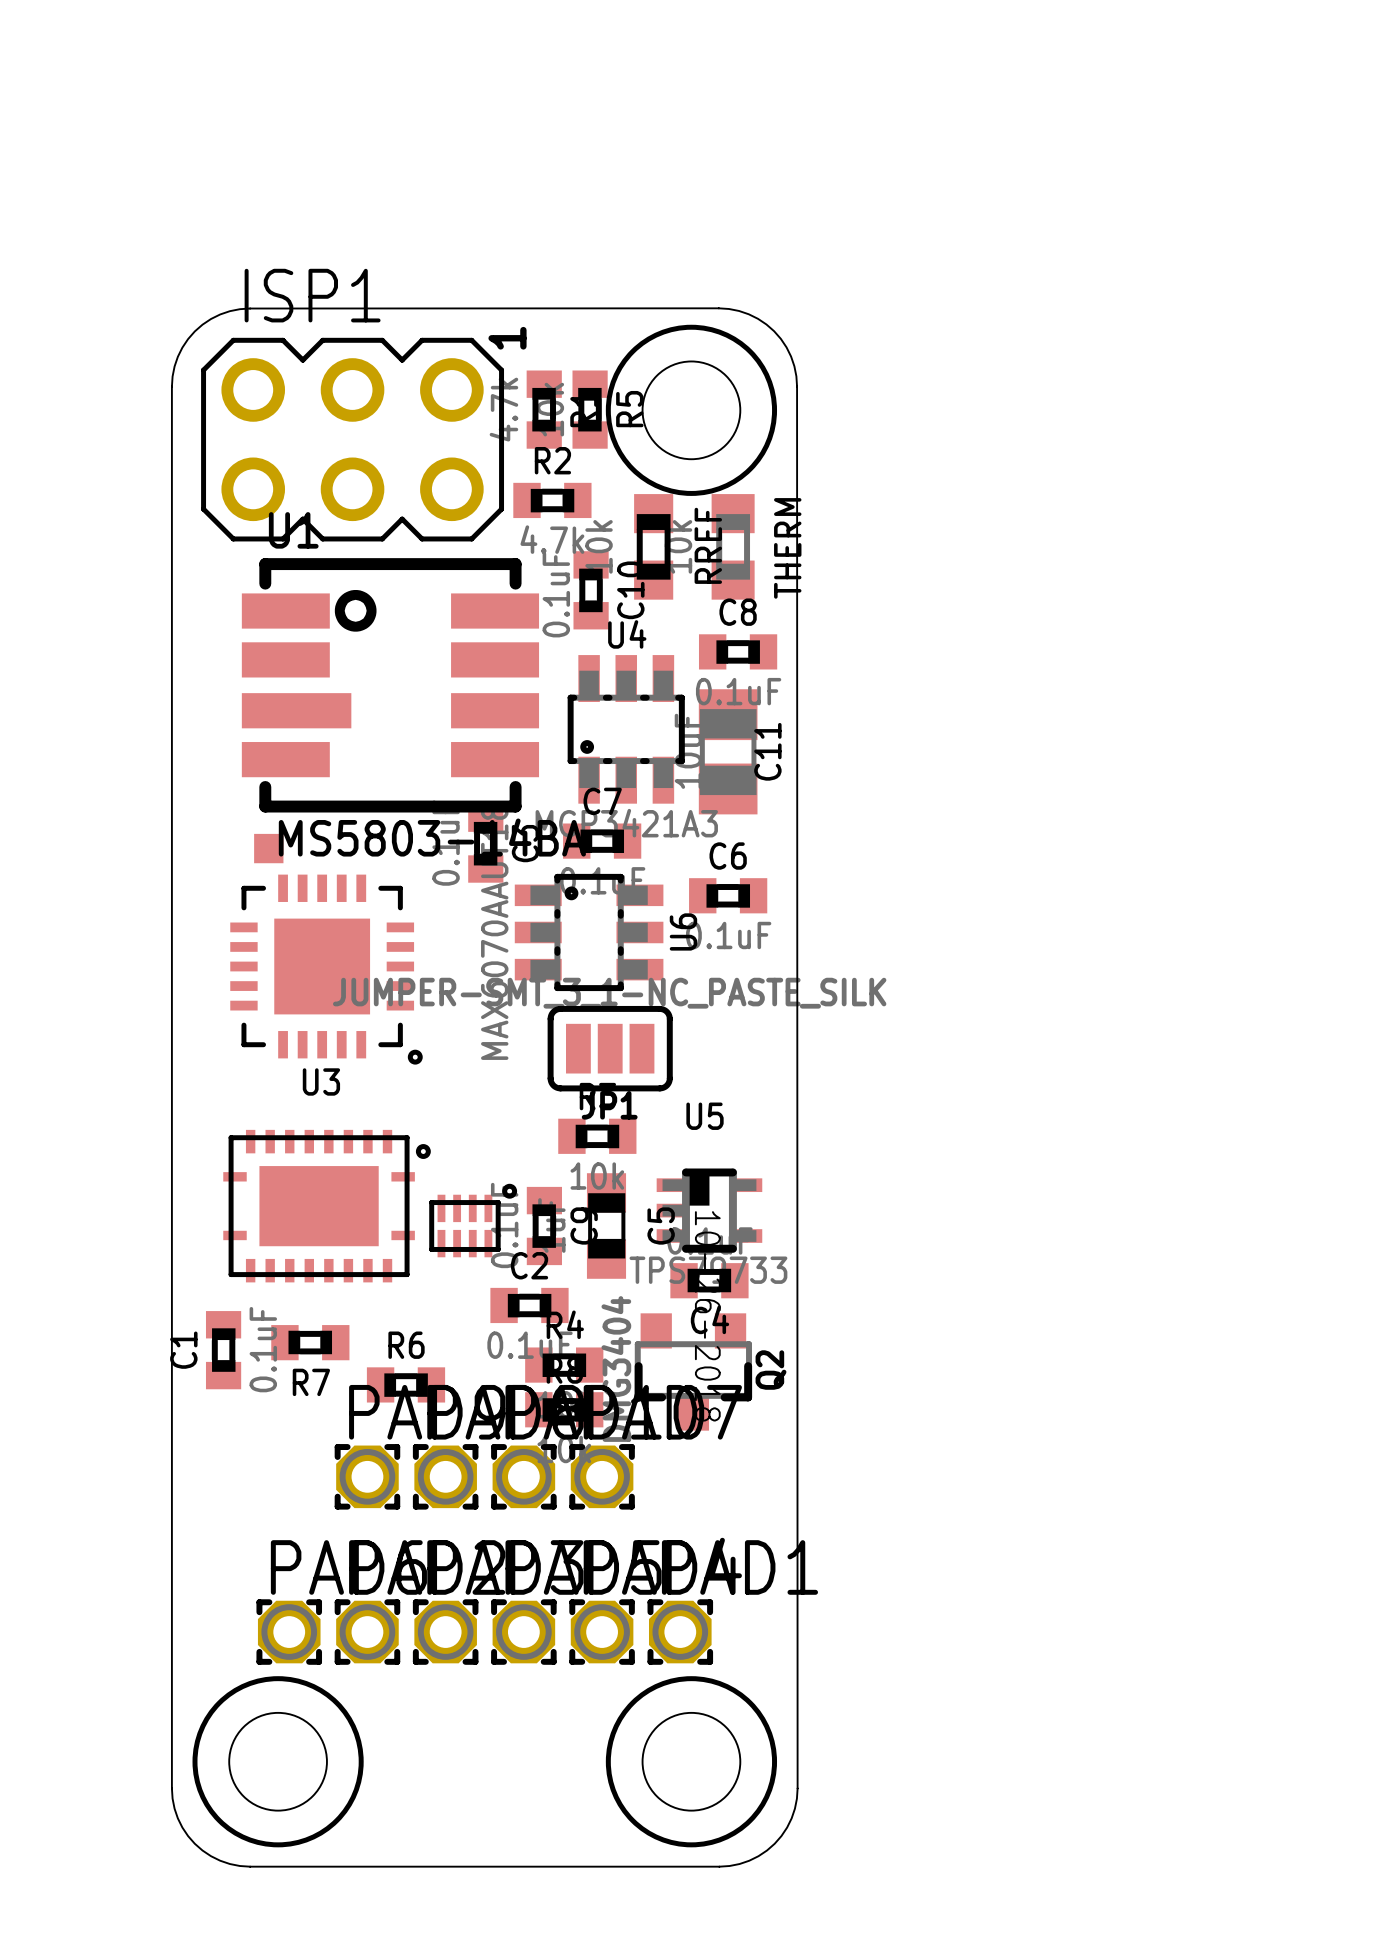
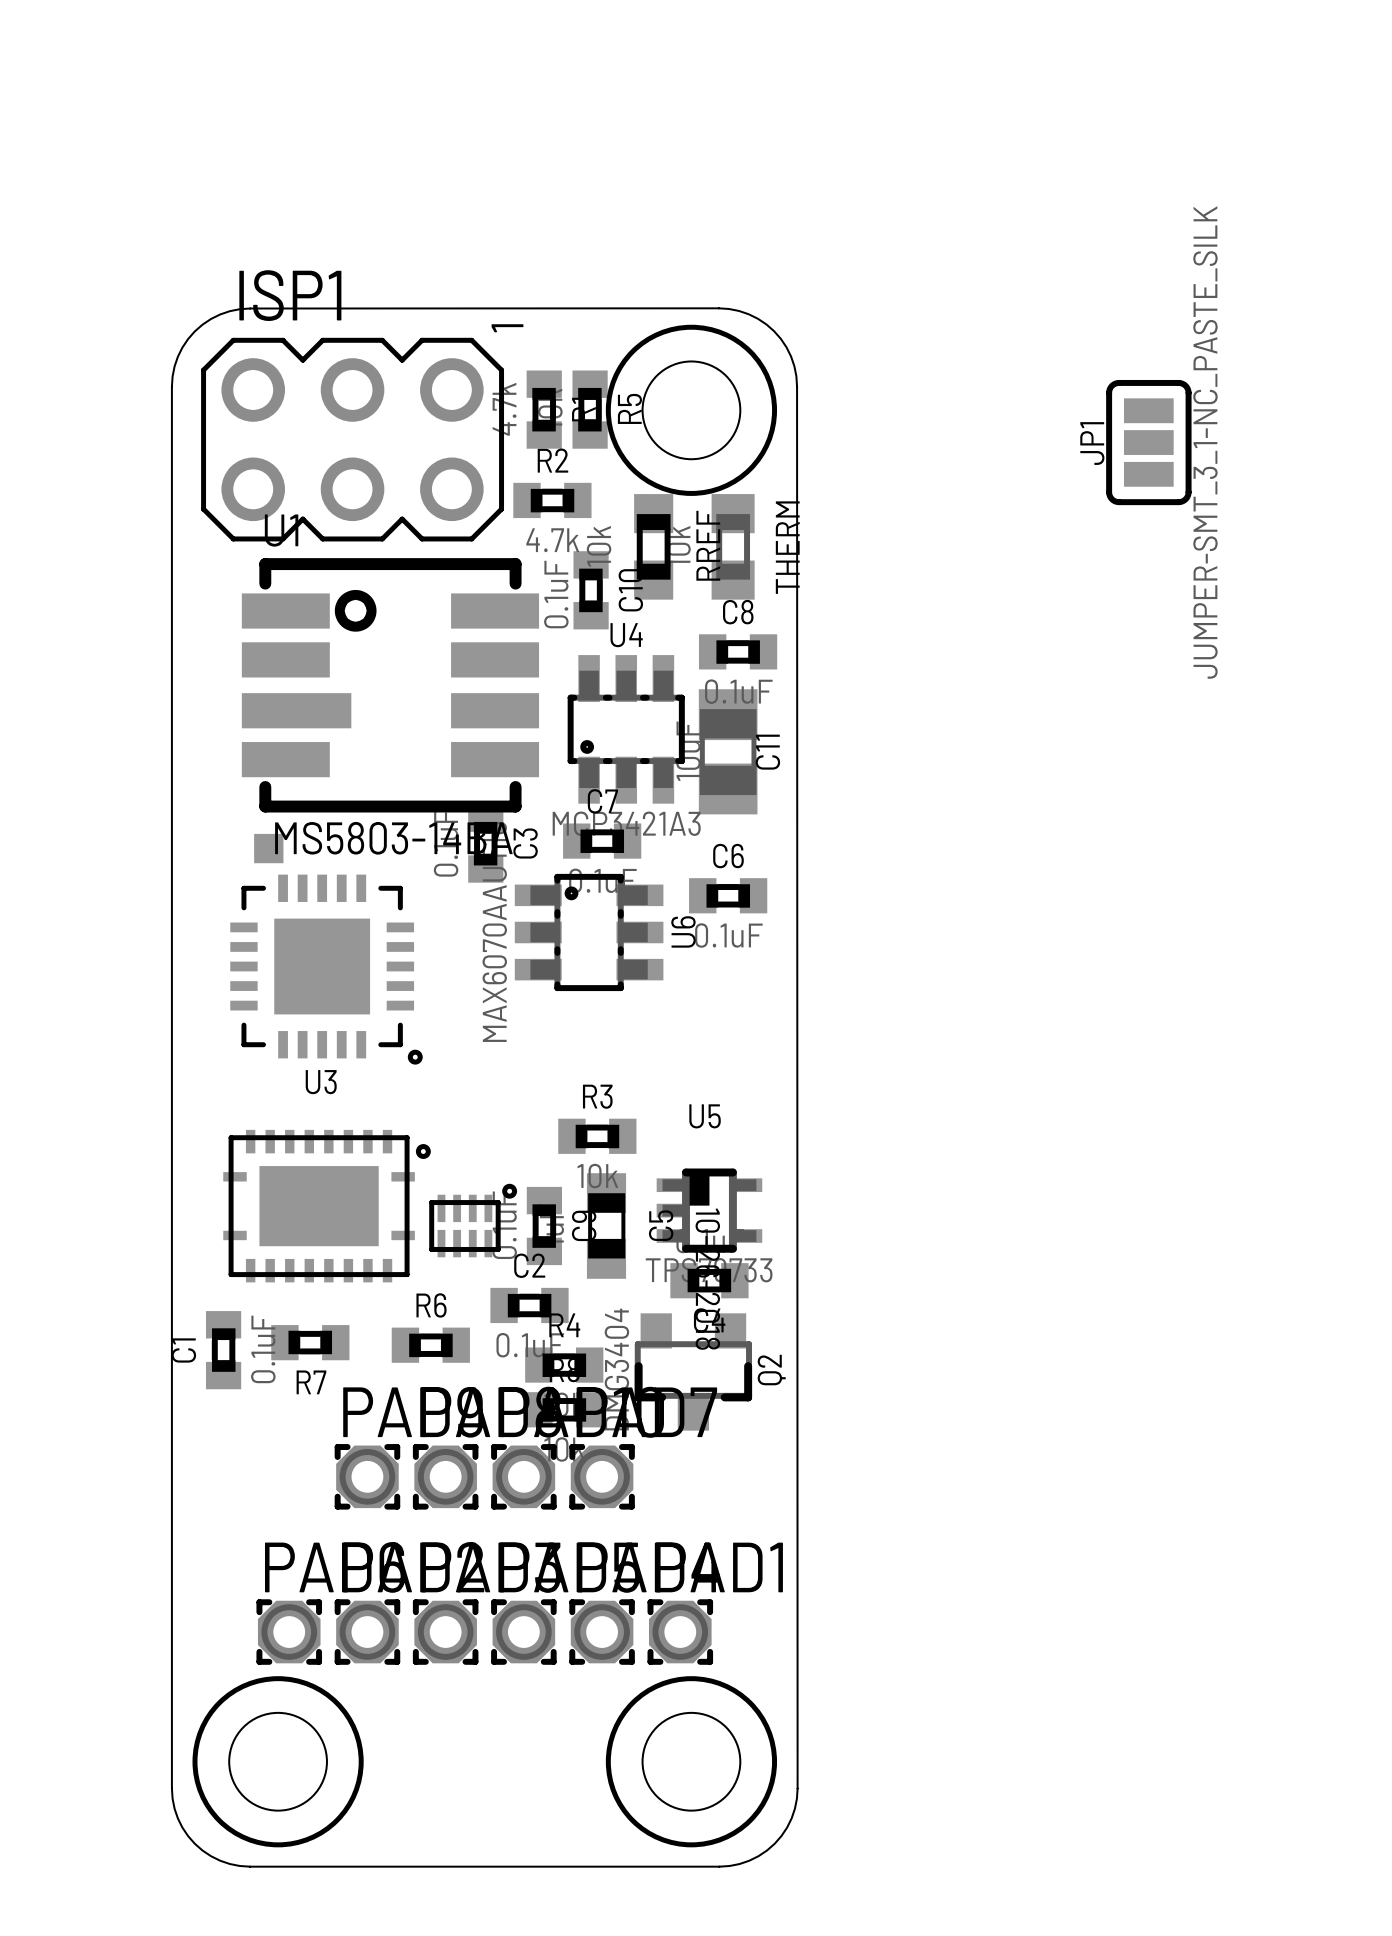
JP1 rotation: 0° (610, 1048) -> 90° clockwise (1148, 442)
JP1 position: (610, 1048) -> (1148, 442)
R6 position: (406, 1384) -> (430, 1345)

